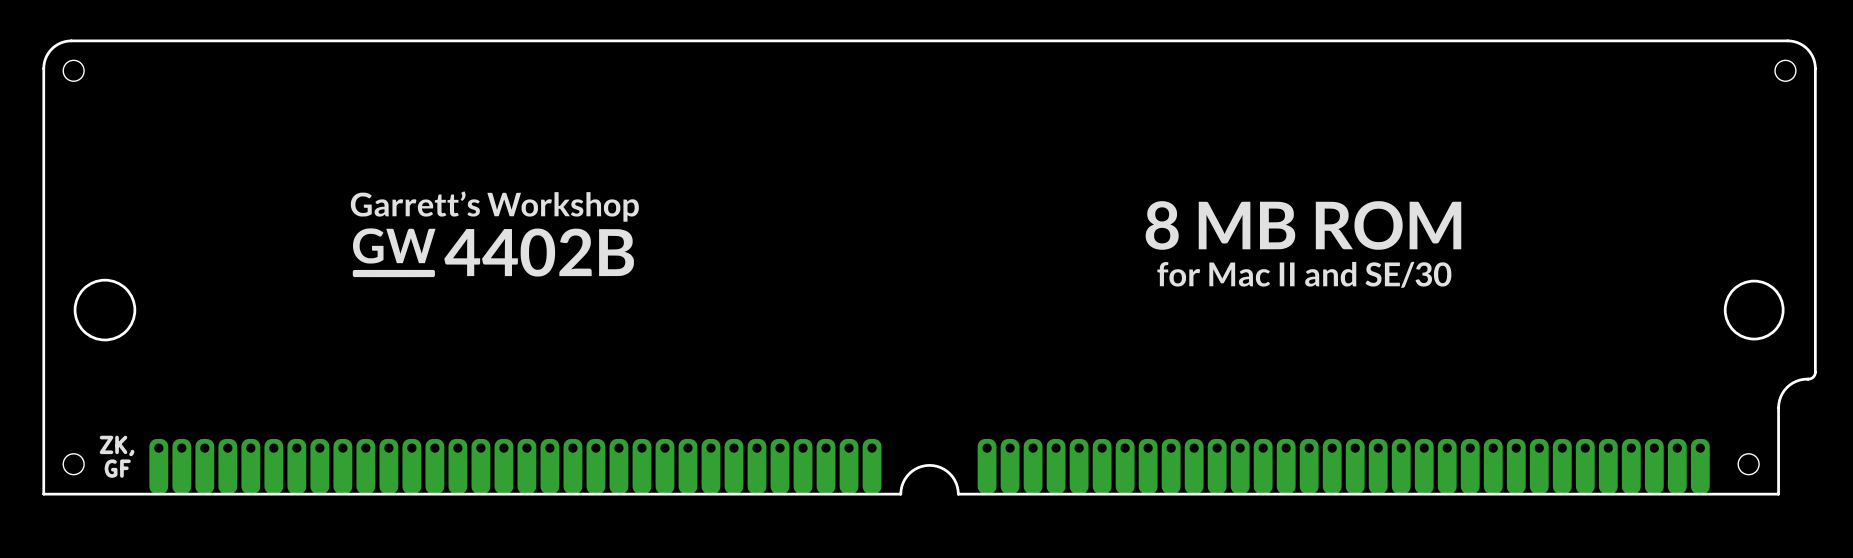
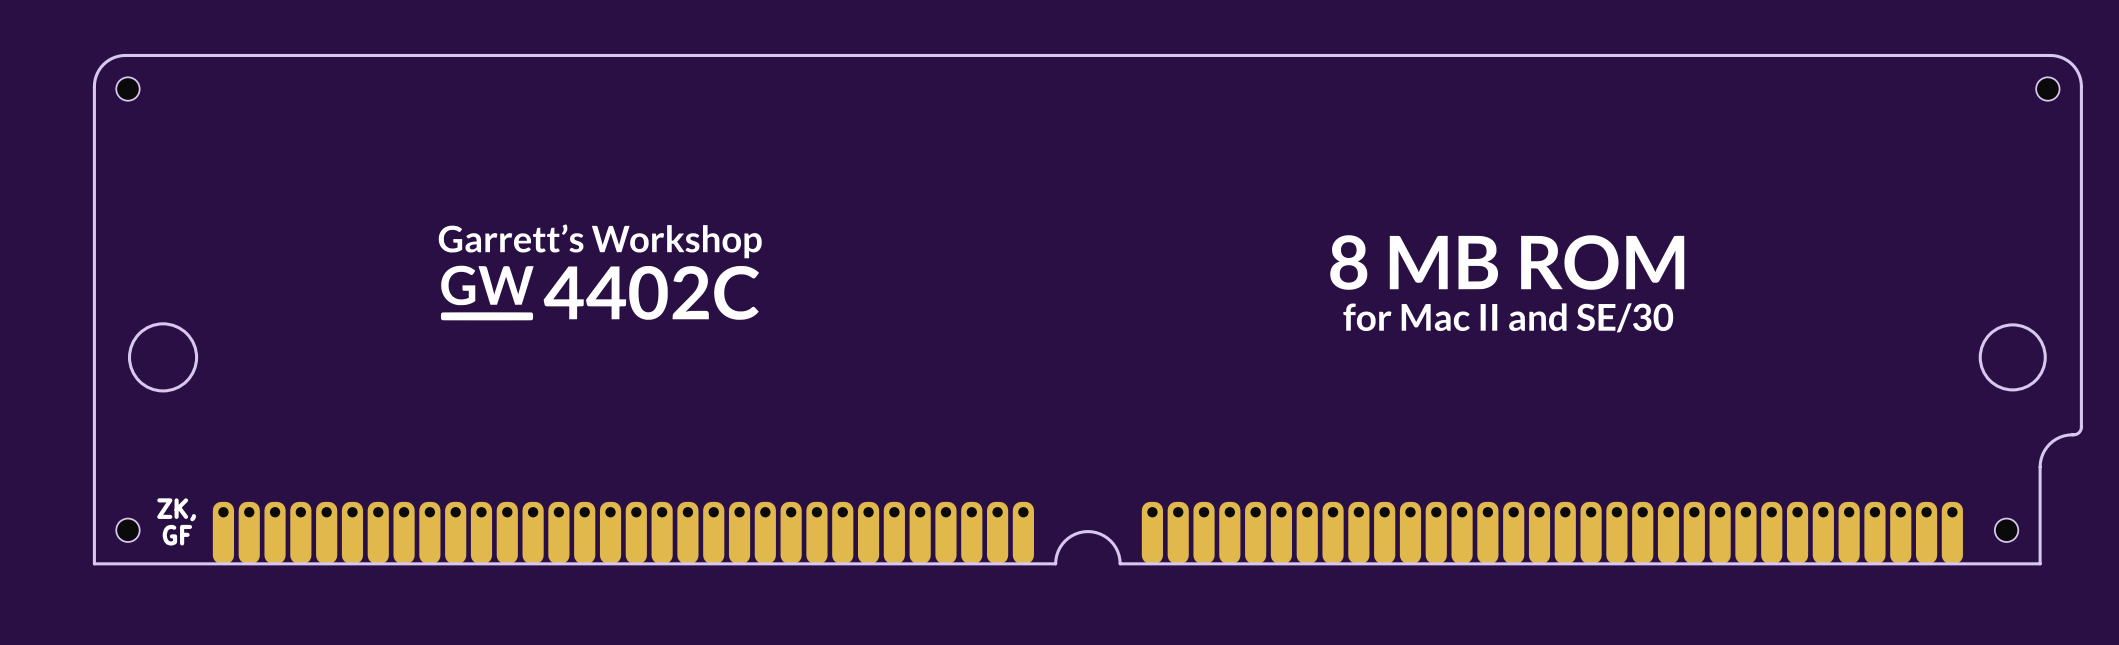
drawing shape: [350, 191, 639, 278] -> [438, 224, 762, 321]

